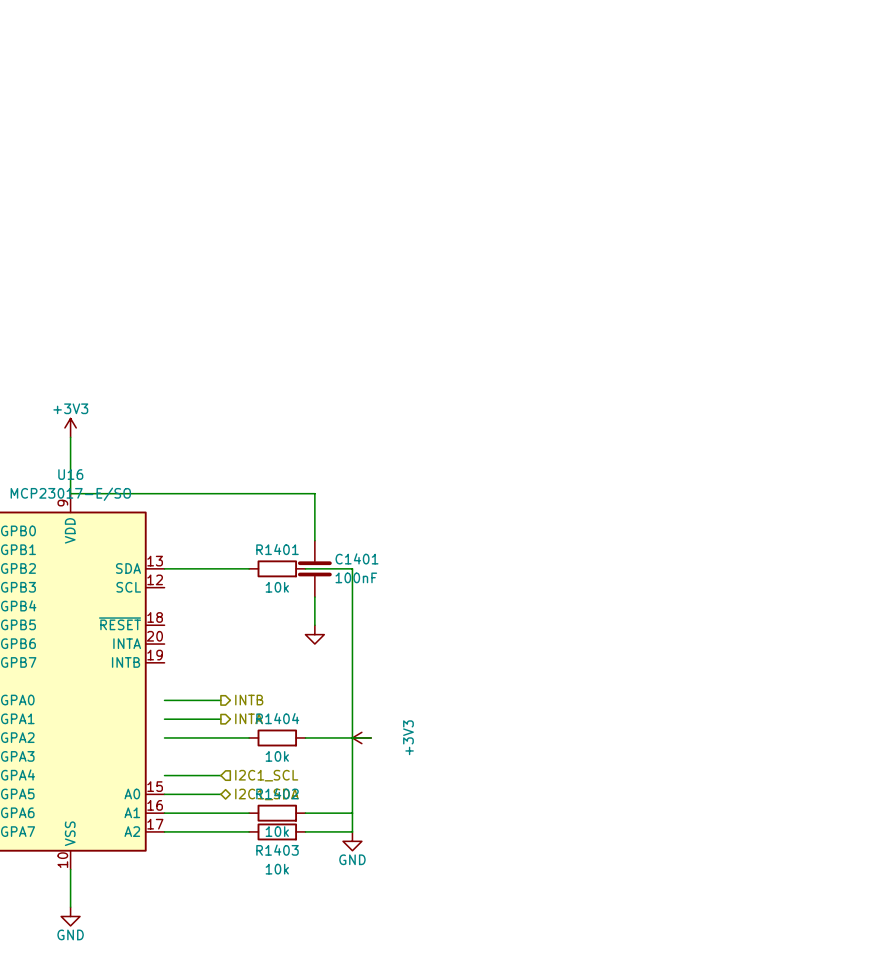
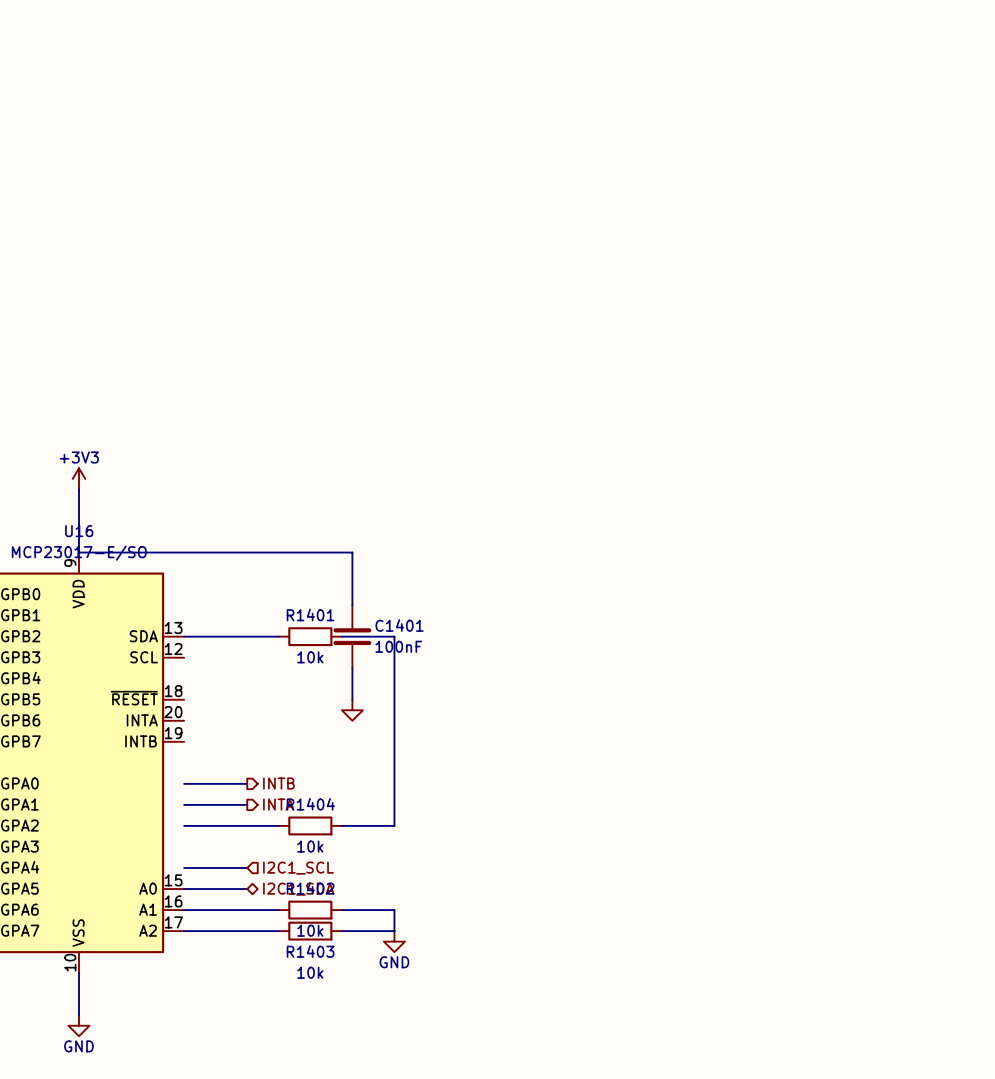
power symbol: +3V3 (361, 737) -> none
wire: (371, 737) (352, 737) (352, 813) -> none

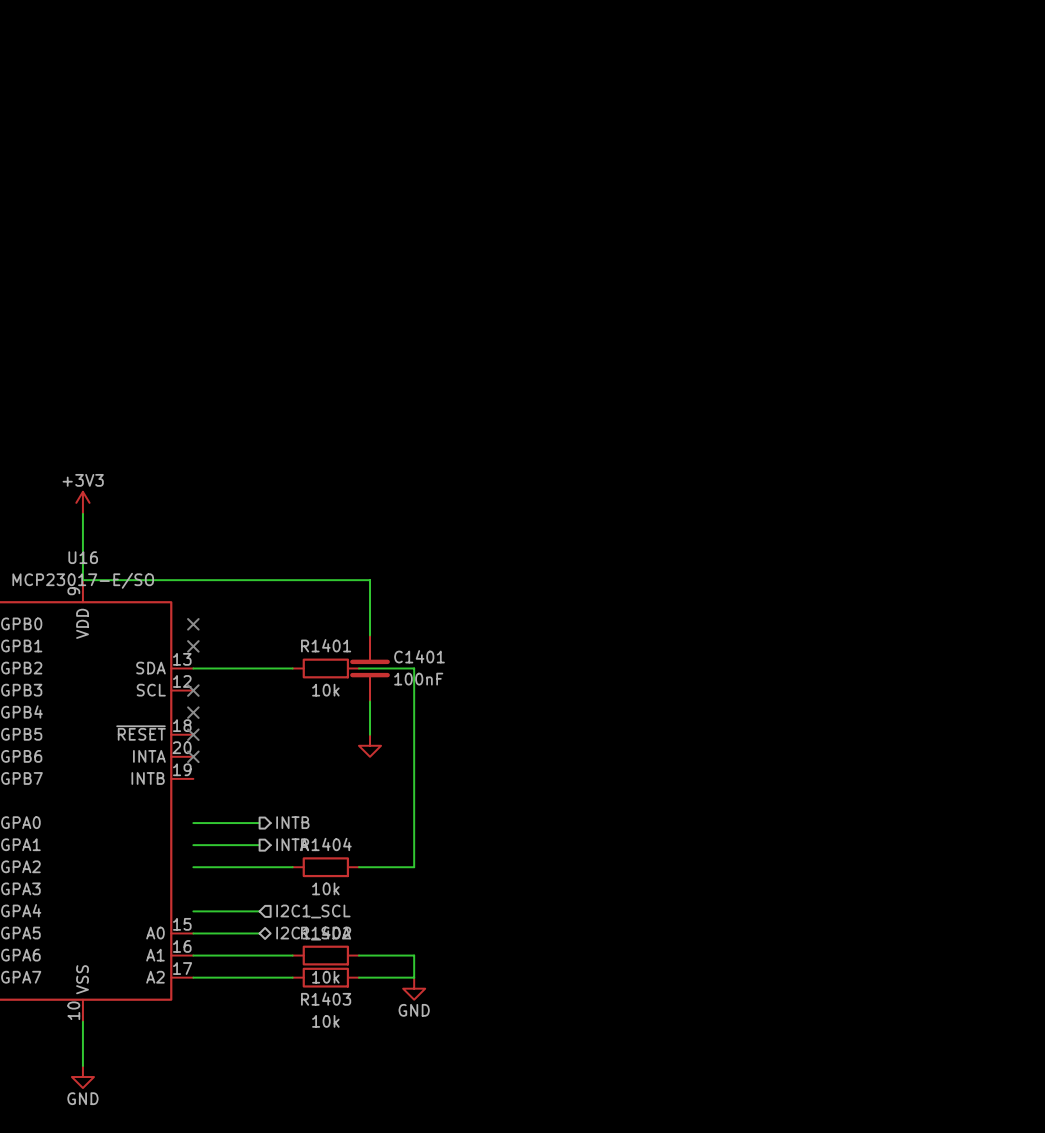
no-connect mark: none -> (193, 624)
no-connect mark: none -> (193, 646)
no-connect mark: none -> (193, 690)
no-connect mark: none -> (193, 712)
no-connect mark: none -> (193, 734)
no-connect mark: none -> (193, 756)

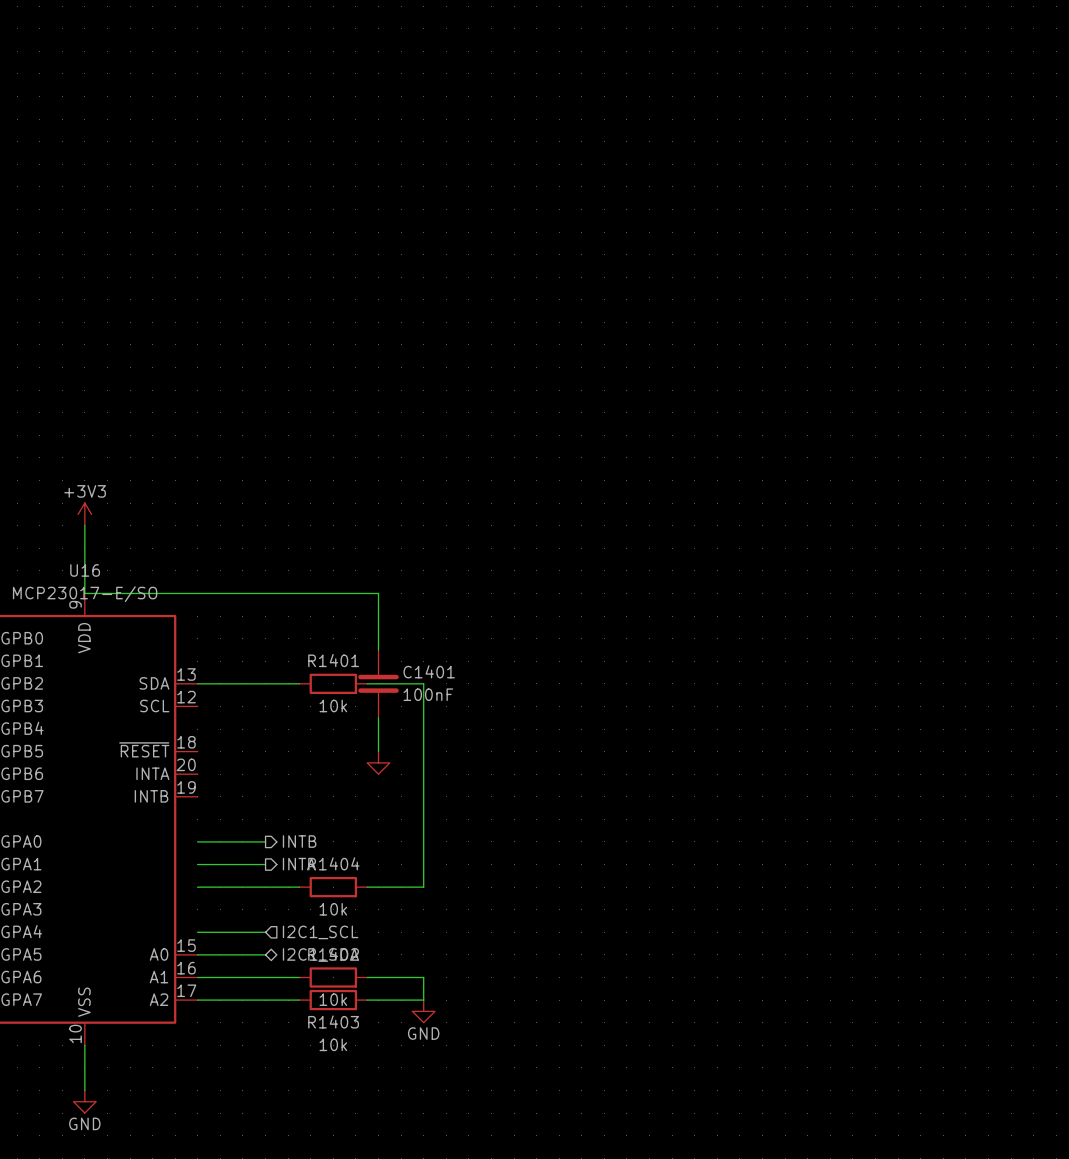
no-connect mark: (193, 624) -> none
no-connect mark: (193, 646) -> none
no-connect mark: (193, 690) -> none
no-connect mark: (193, 712) -> none
no-connect mark: (193, 734) -> none
no-connect mark: (193, 756) -> none

